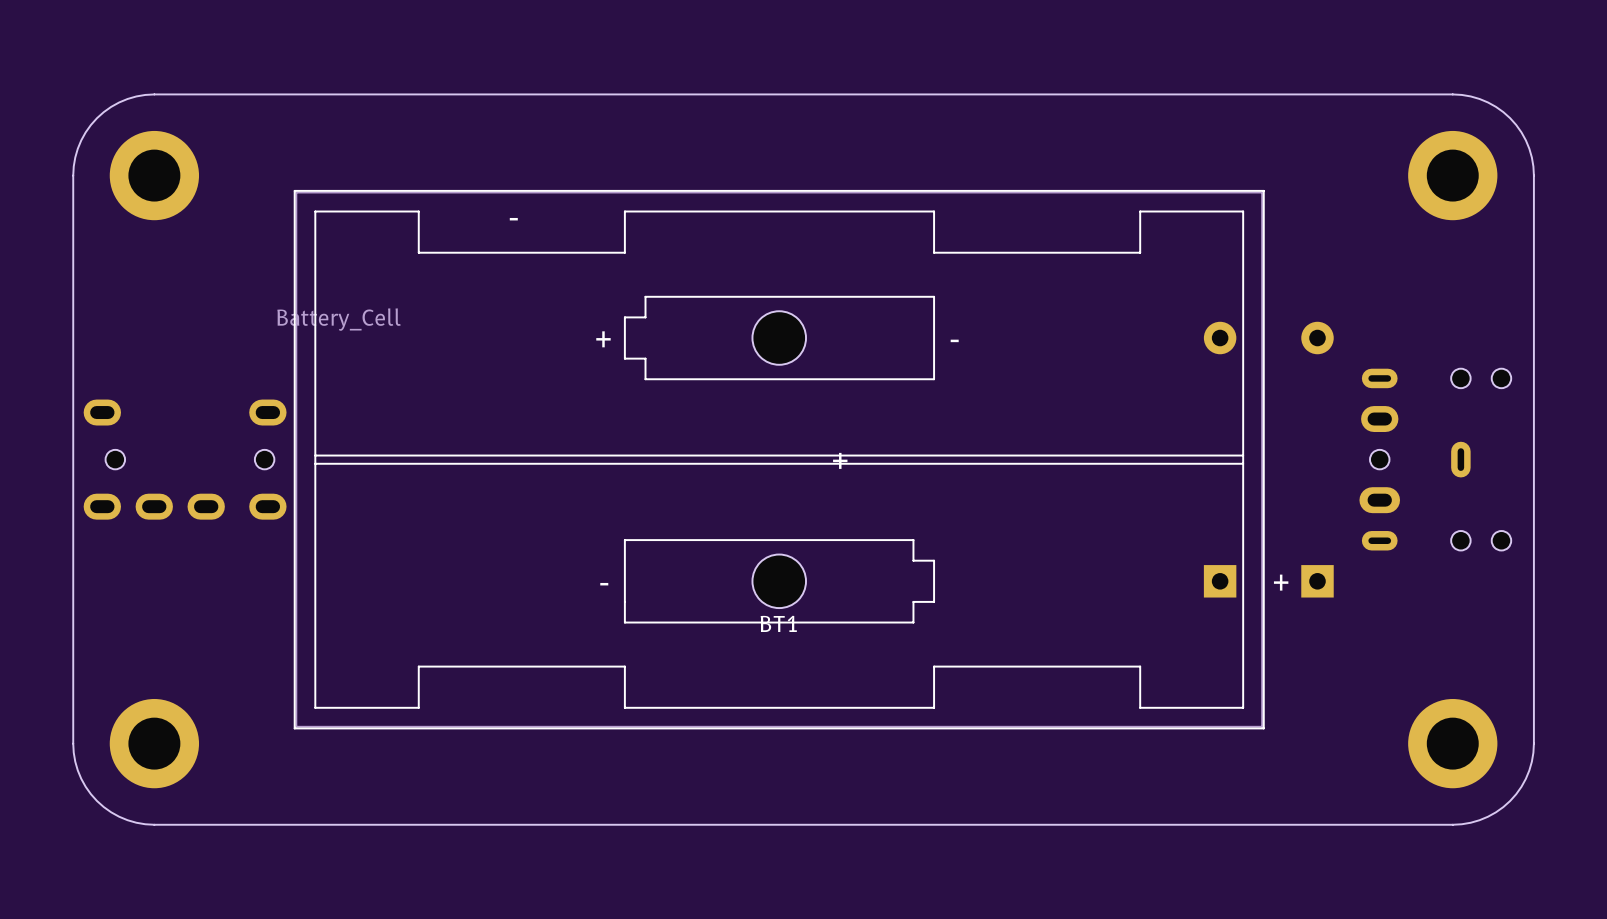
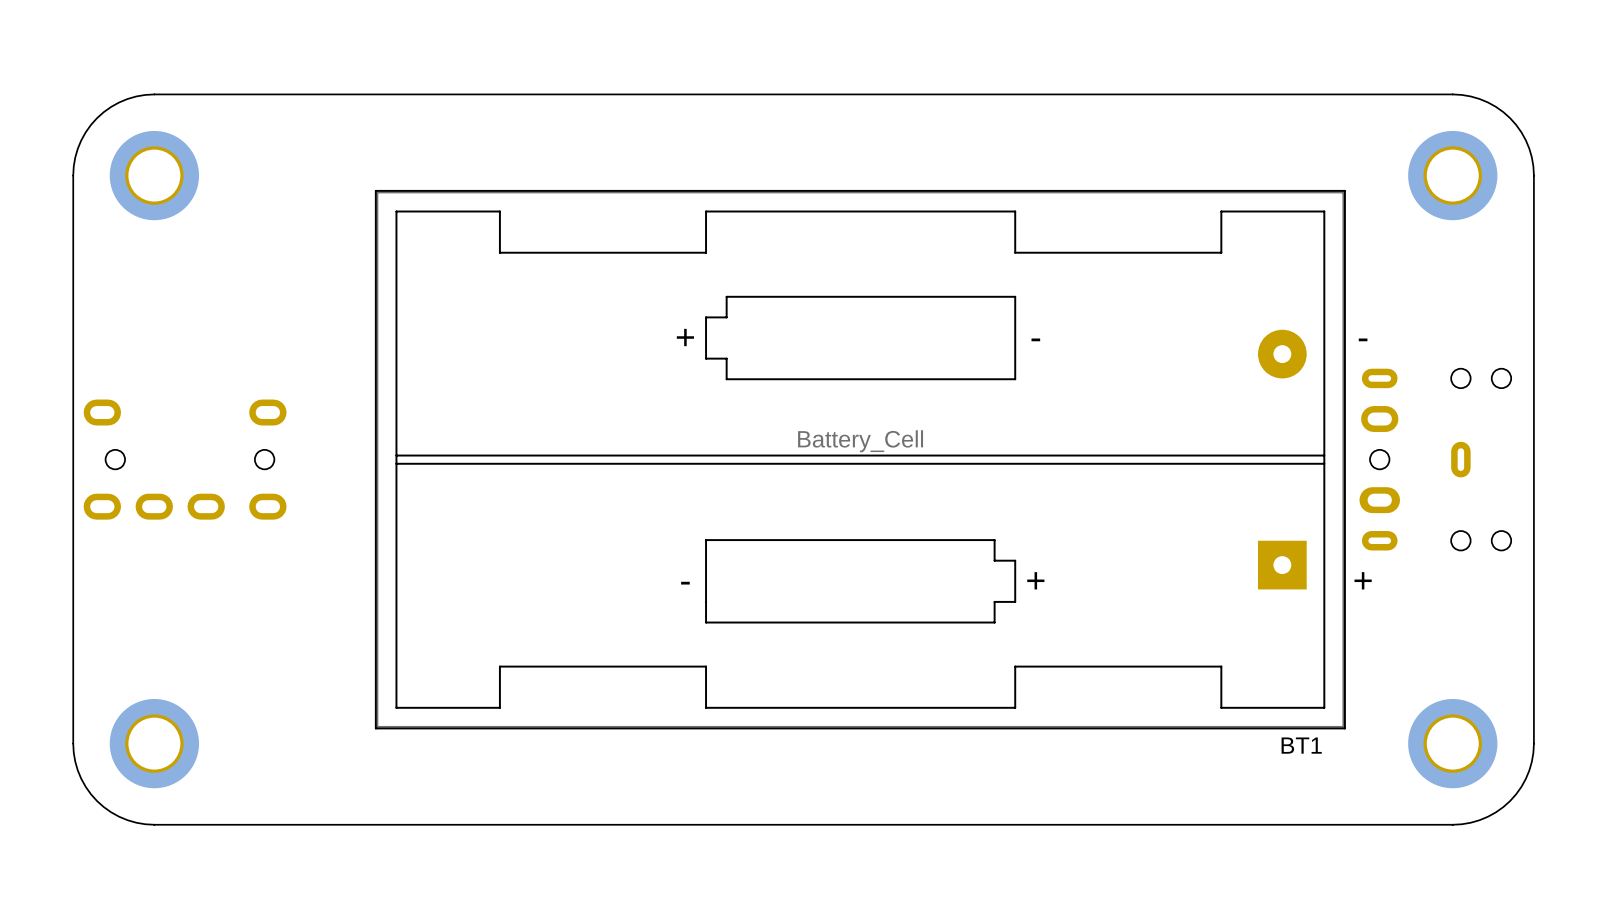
BT1 footprint: [293, 189, 1334, 730] -> [374, 189, 1346, 730]
BT1 value position: Battery_Cell (339, 319) -> Battery_Cell (860, 441)
BT1 name position: BT1 (778, 623) -> BT1 (1301, 745)

